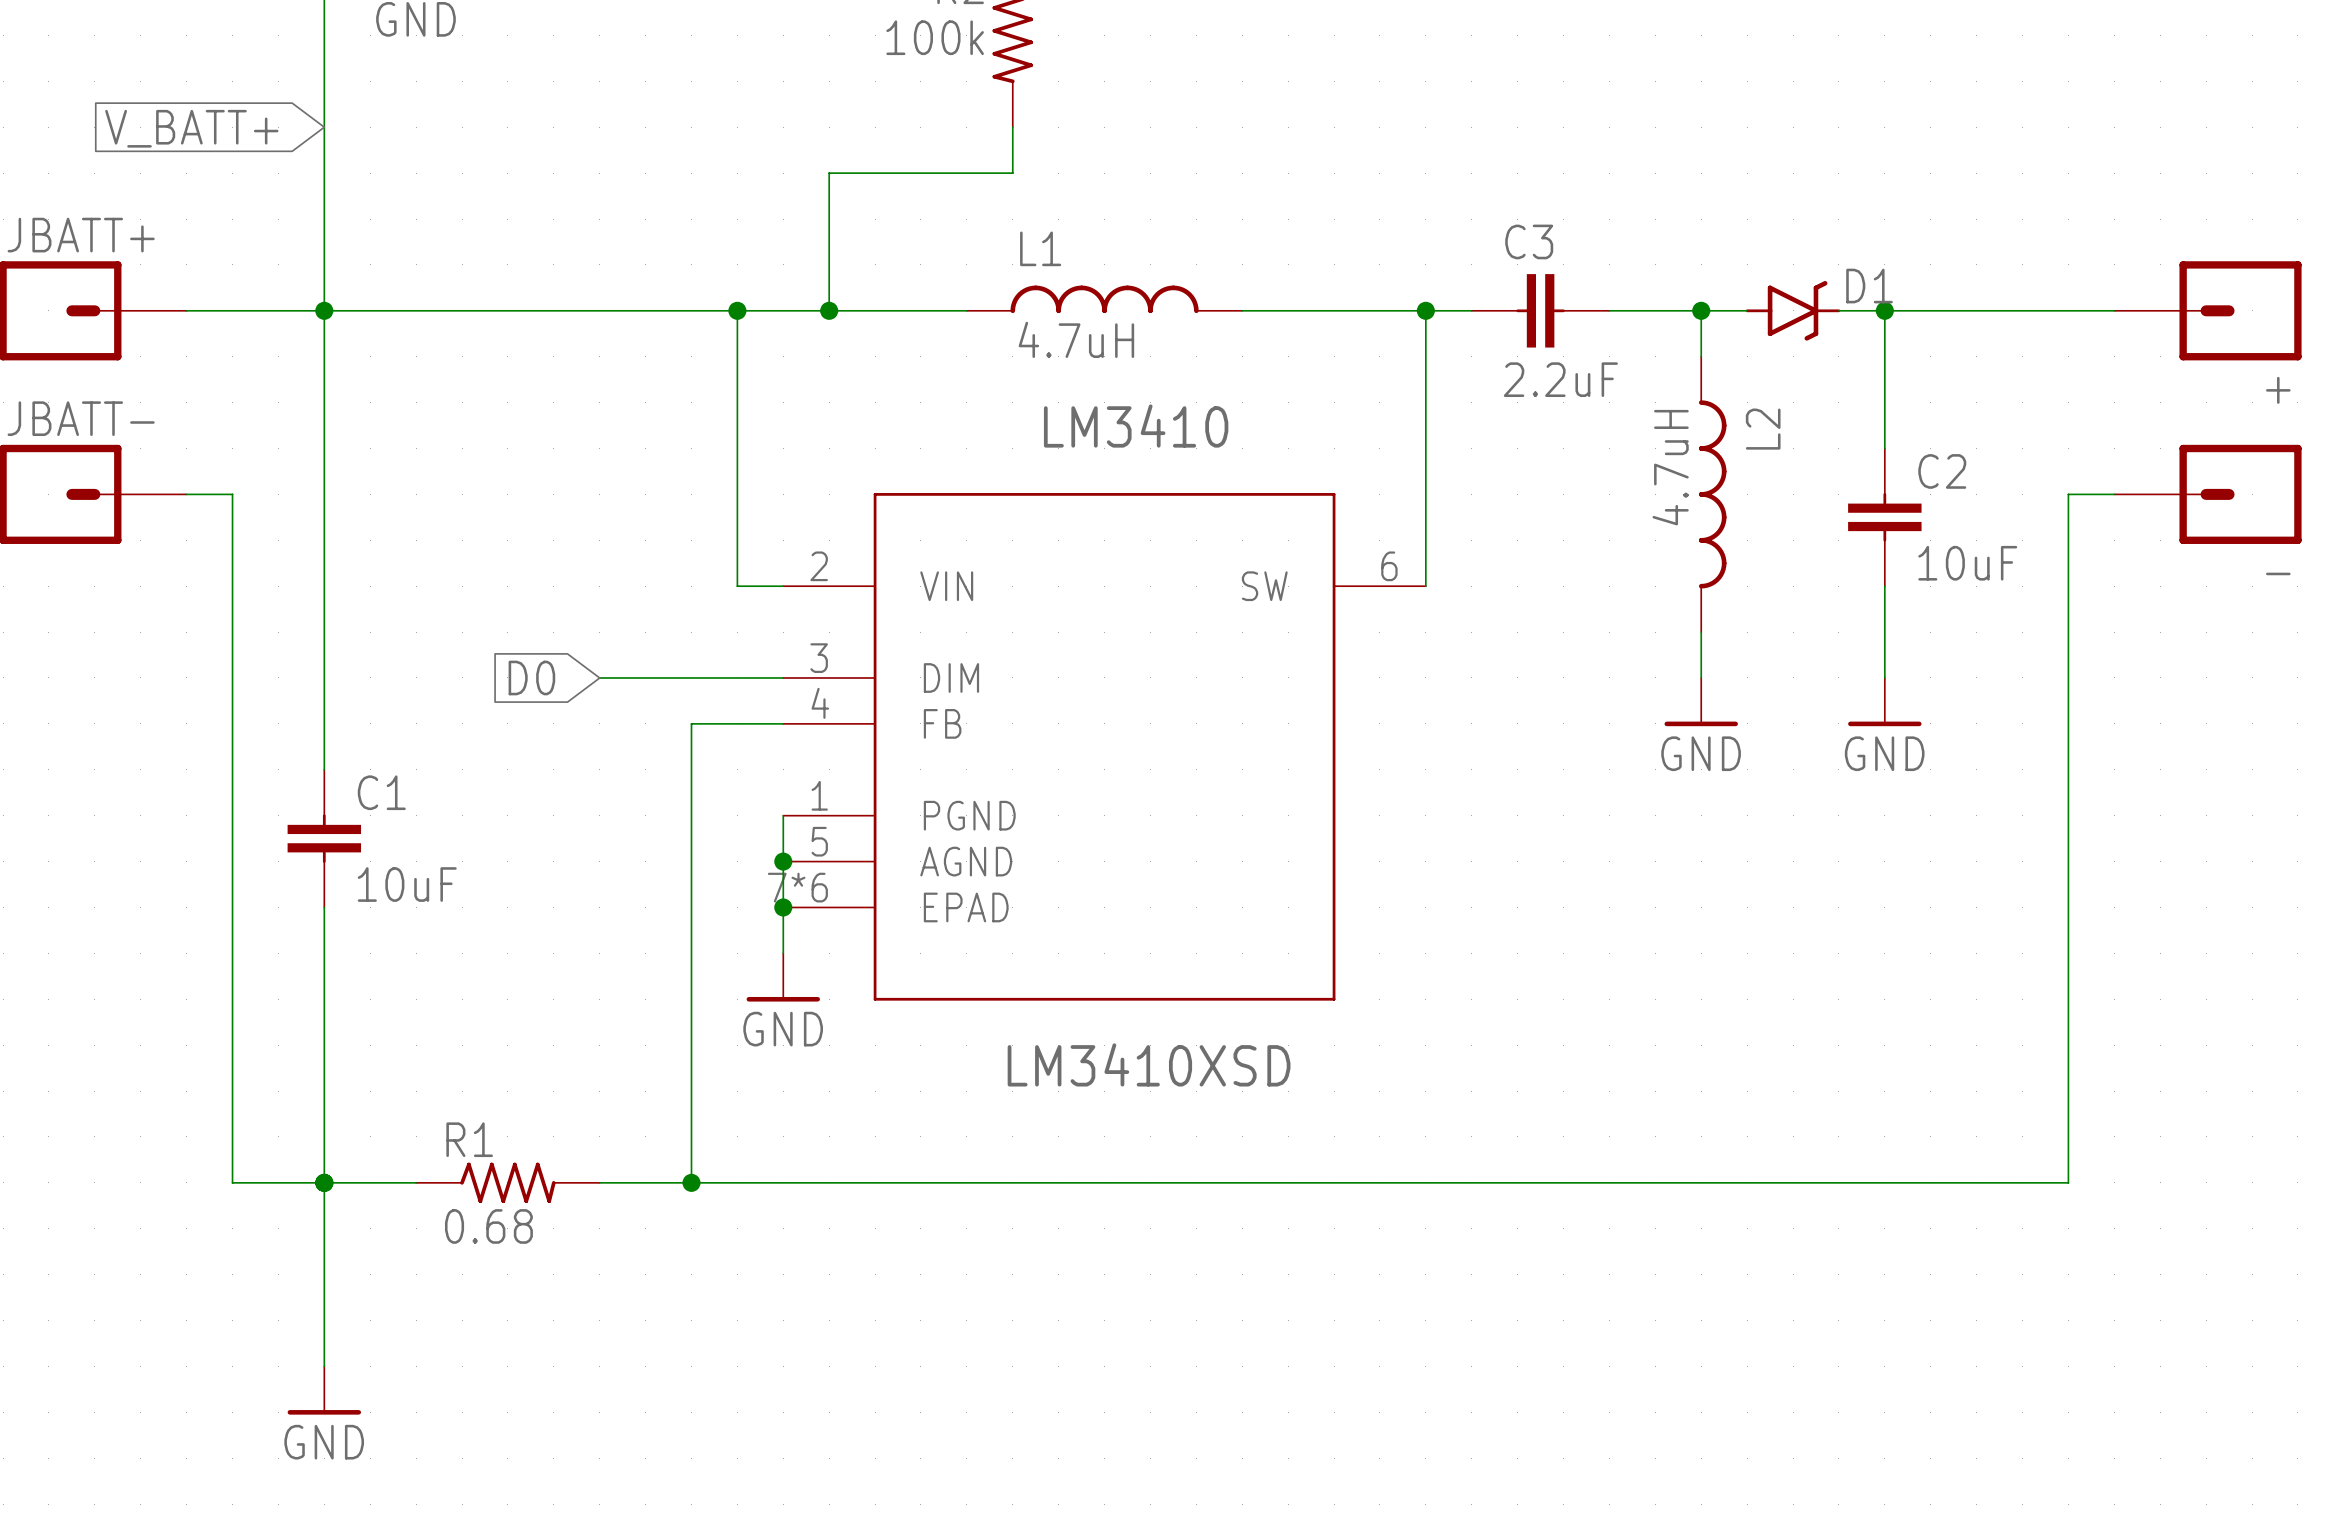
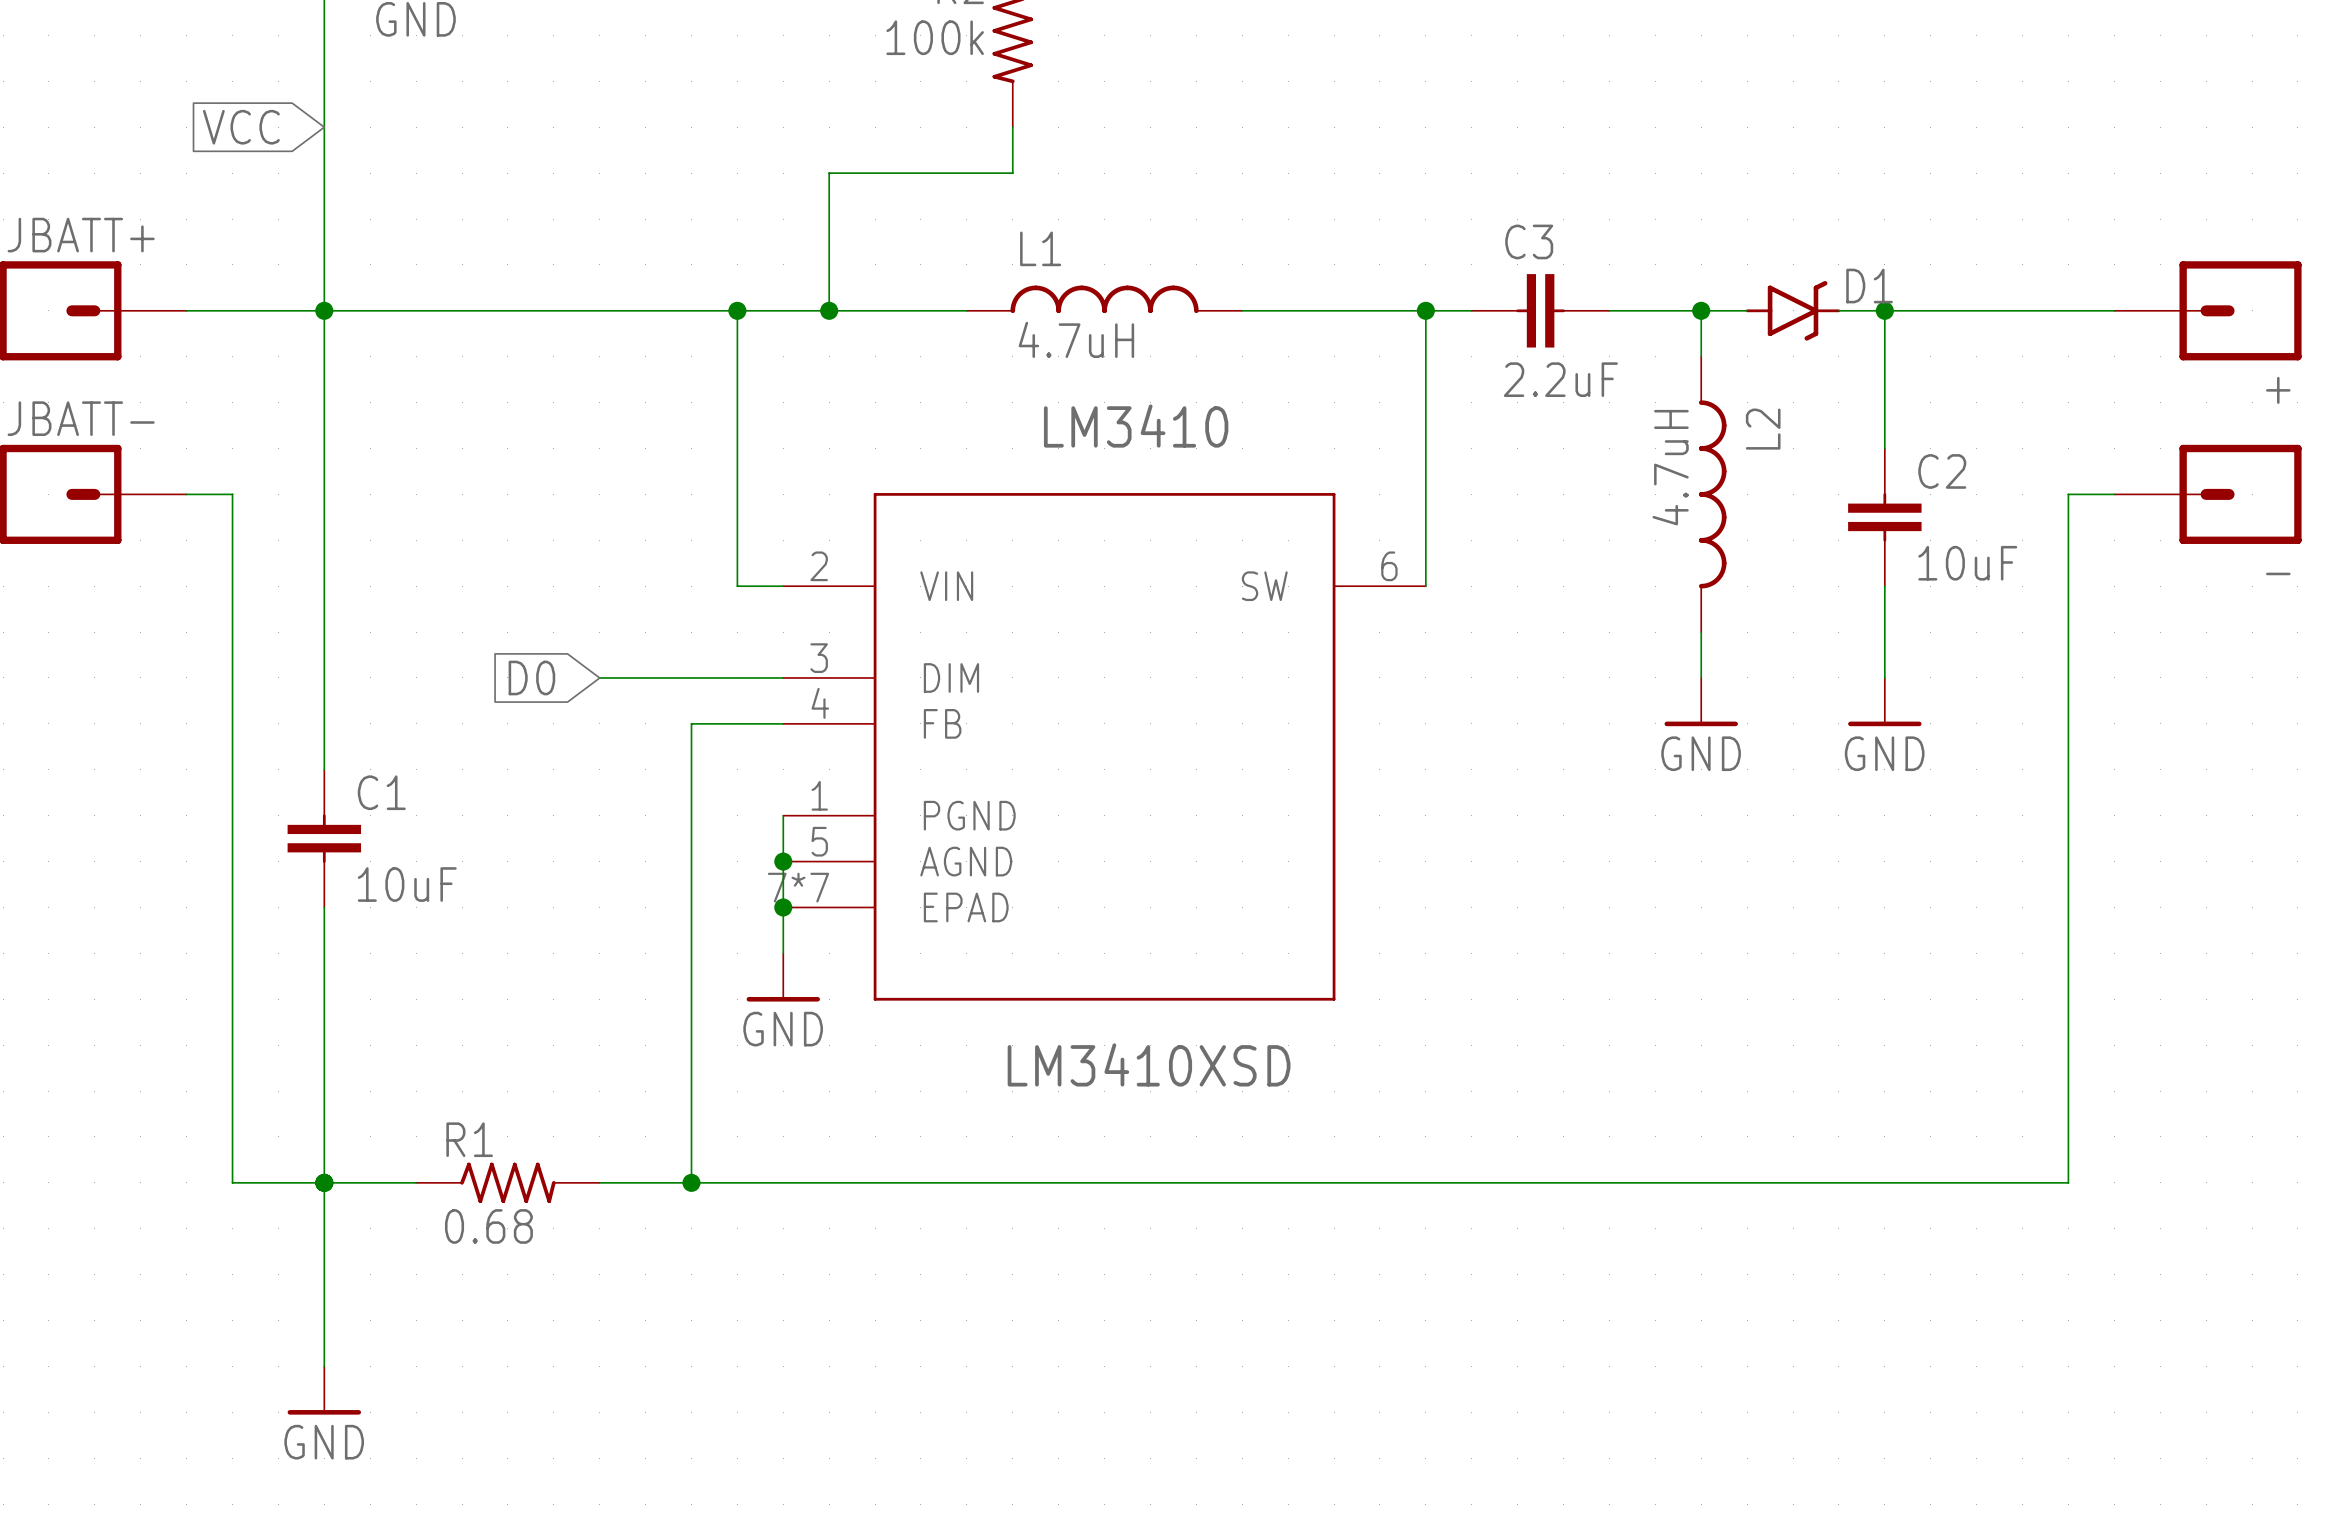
global label: V_BATT+ (191, 128) -> VCC (241, 127)
LM3410 pin number: 7*6 (797, 887) -> 7*7 (798, 887)

